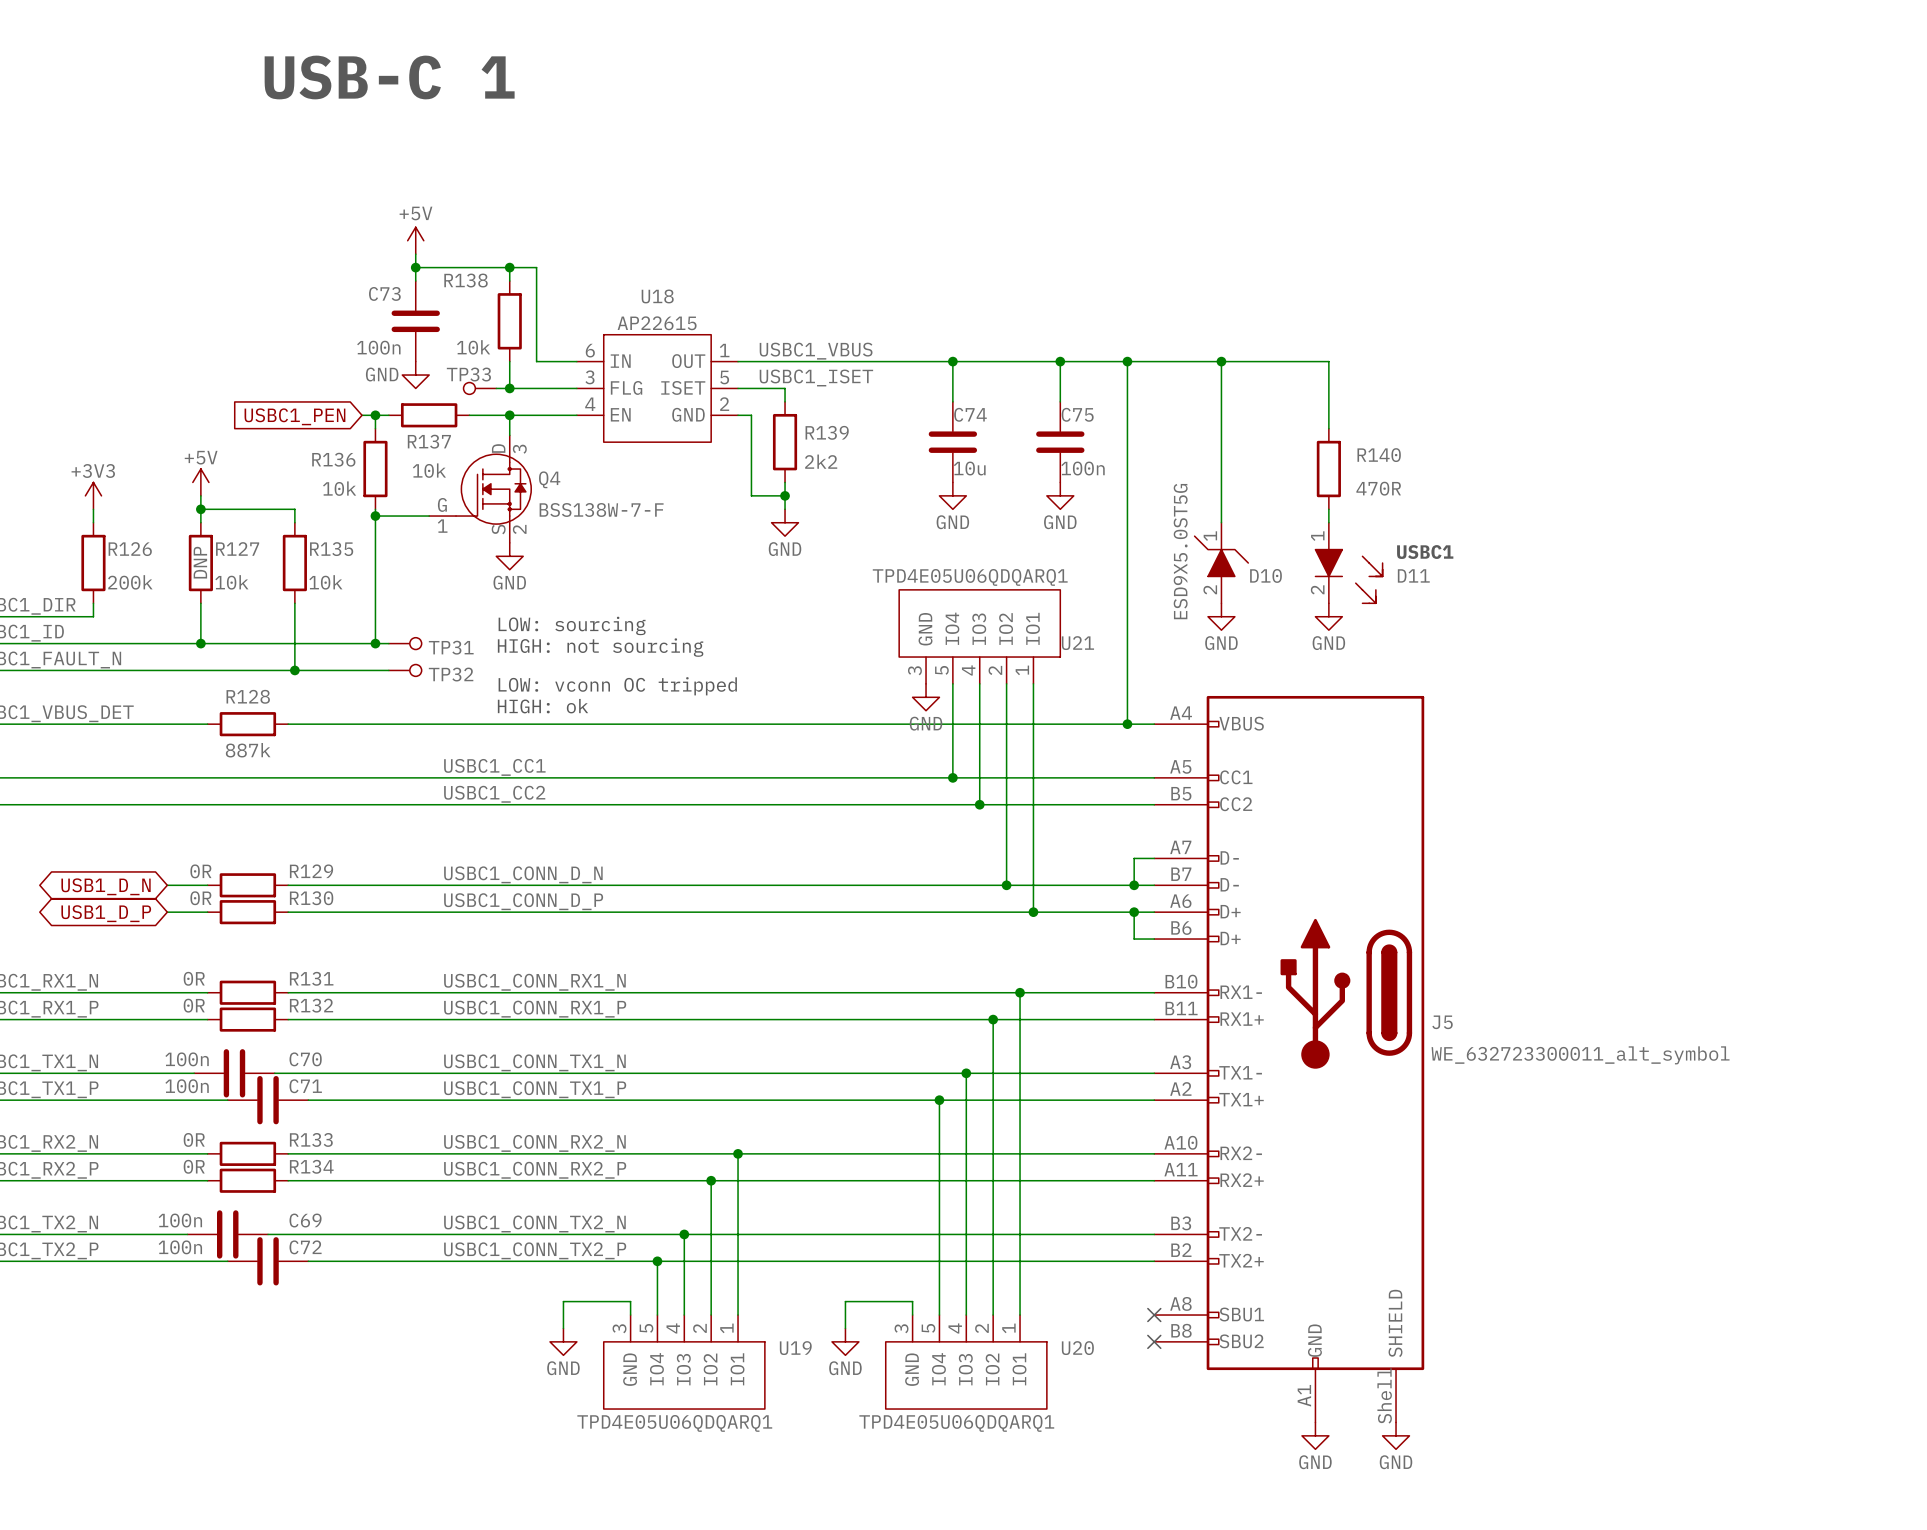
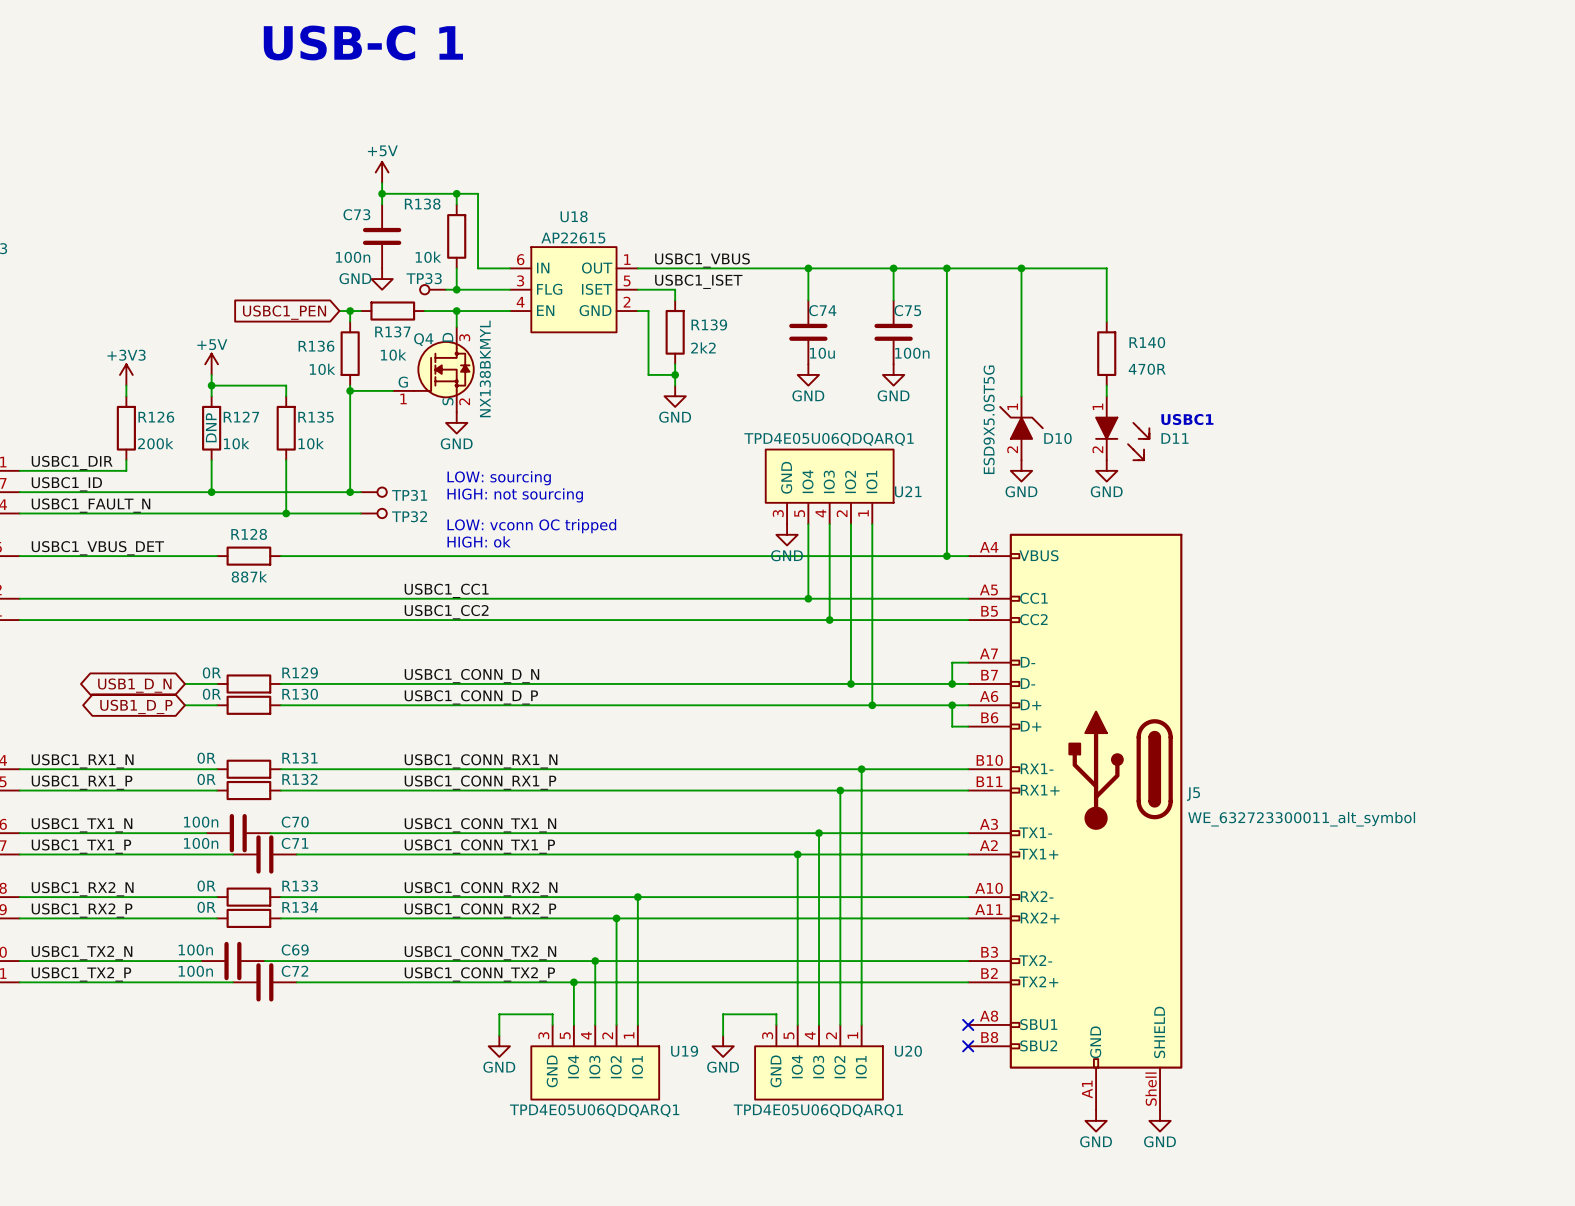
Q4 name position: Q4 (549, 479) -> Q4 (423, 339)
Q4 value: BSS138W-7-F (601, 509) -> NX138BKMYL (485, 368)

